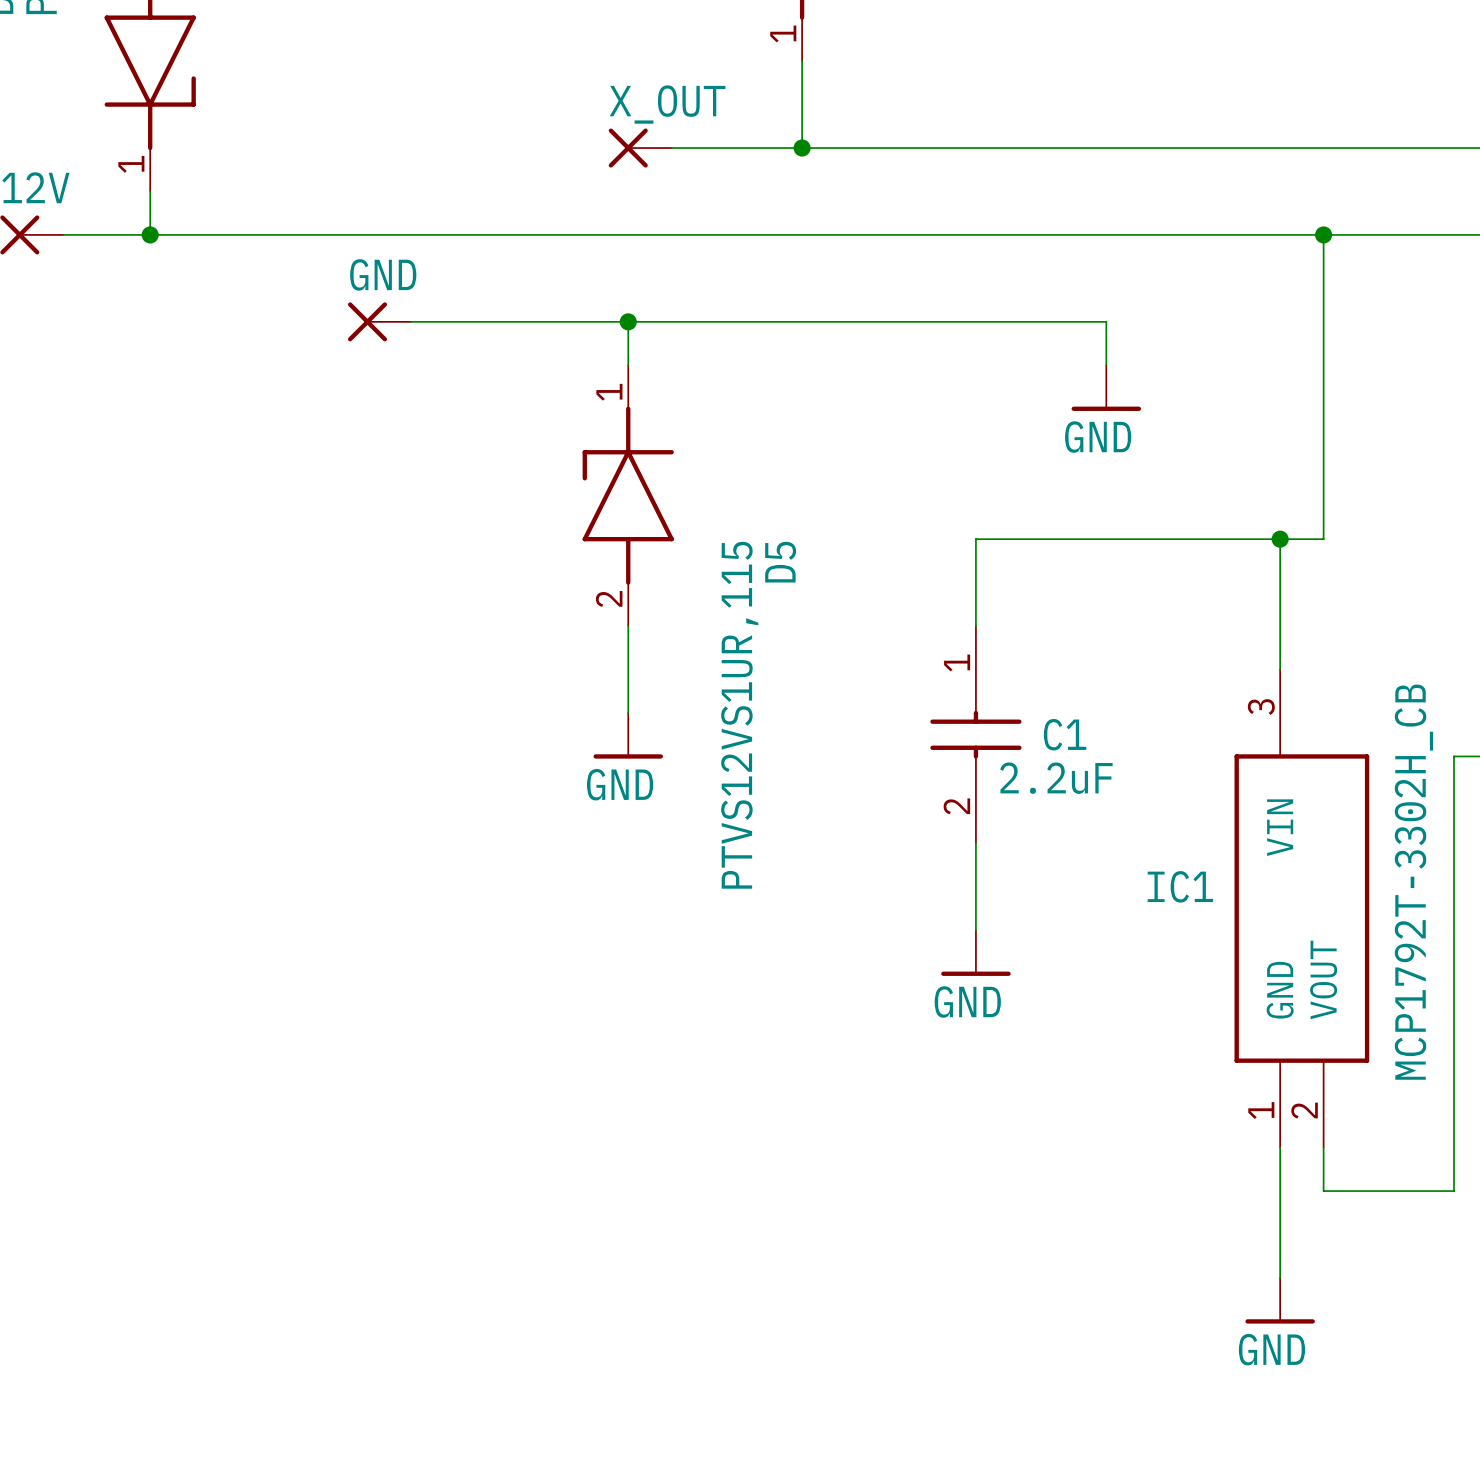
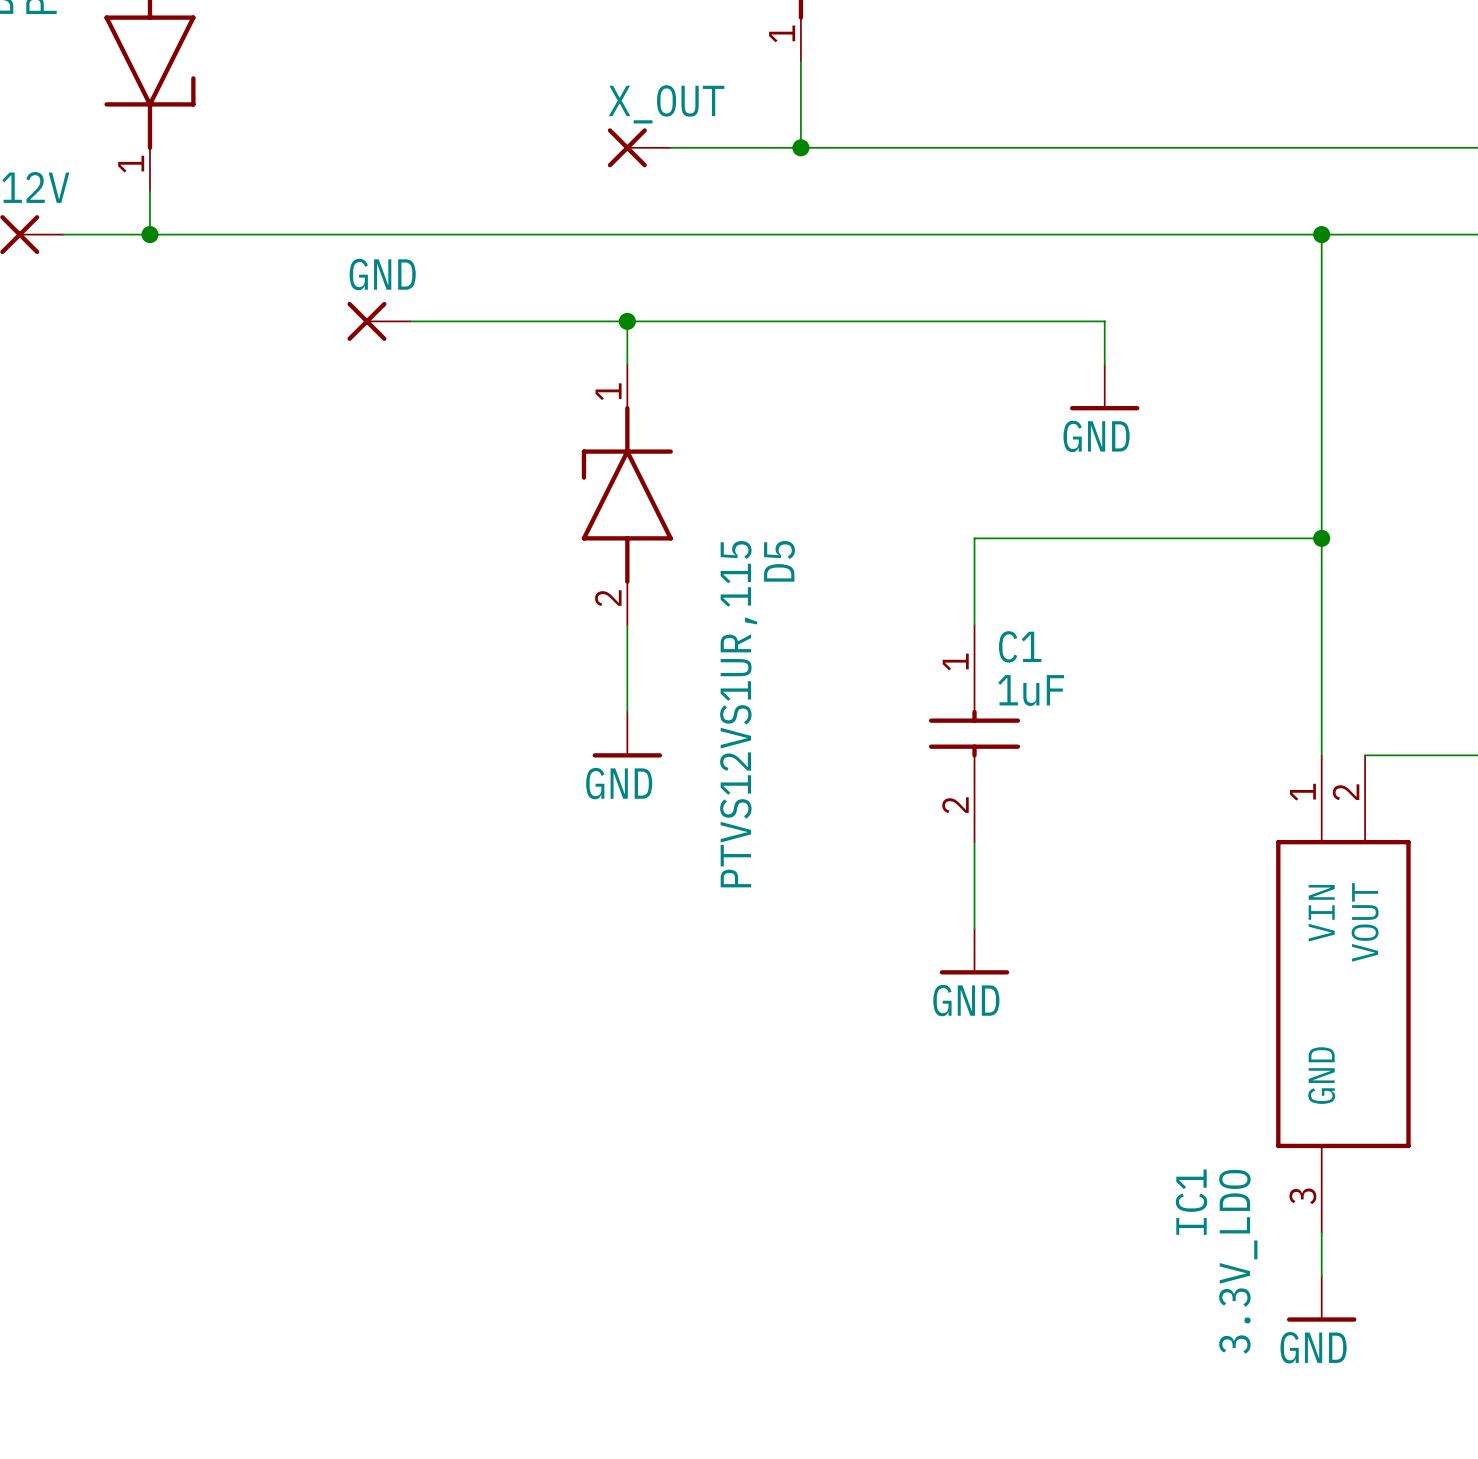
wire: (1280, 539) (1280, 669) -> none
junction position: (1280, 539) -> (1321, 538)
wire: none -> (1321, 538) (1321, 755)
IC1 symbol: [1234, 669, 1370, 1148] -> [1276, 755, 1411, 1233]
C1 name position: C1 (1065, 734) -> C1 (1020, 646)
wire: (1453, 756) (1453, 1191) (1323, 1191) (1323, 1147) -> (1451, 755) (1365, 755)
C1 value: 2.2uF (1056, 778) -> 1uF (1031, 690)
IC1 value: MCP1792T-3302H_CB (1413, 882) -> 3.3V_LDO (1238, 1261)
IC1 name position: IC1 (1180, 886) -> IC1 (1191, 1202)
wire: (1280, 1147) (1280, 1277) -> none
wire: none -> (1321, 1232) (1321, 1276)
power symbol position: GND (1280, 1300) -> GND (1321, 1298)

